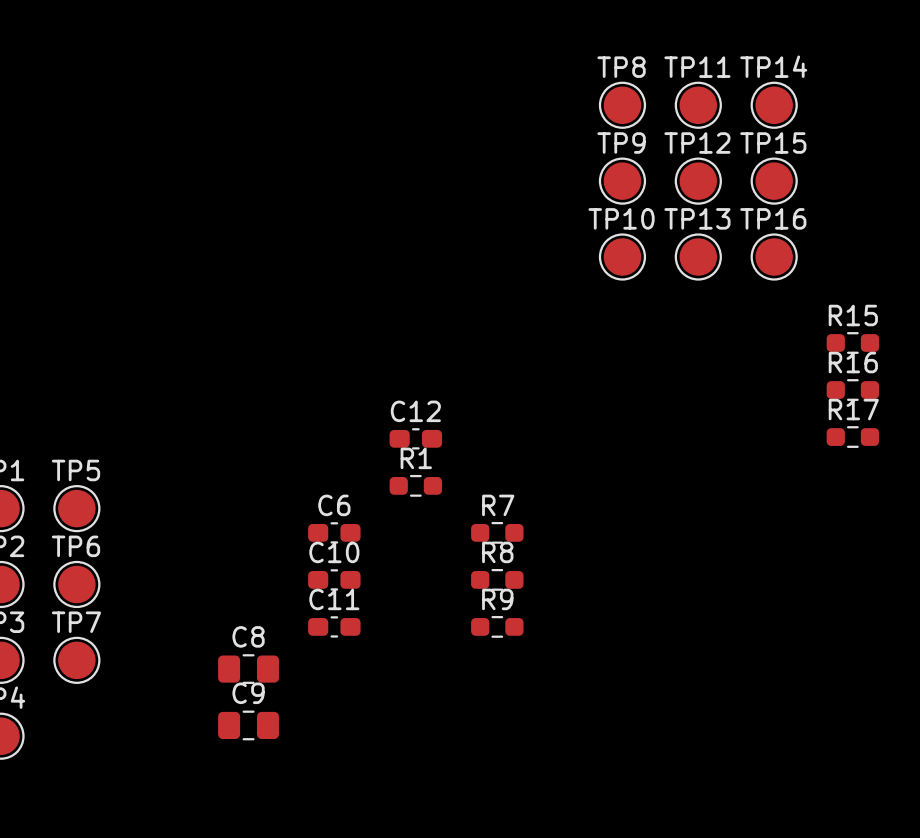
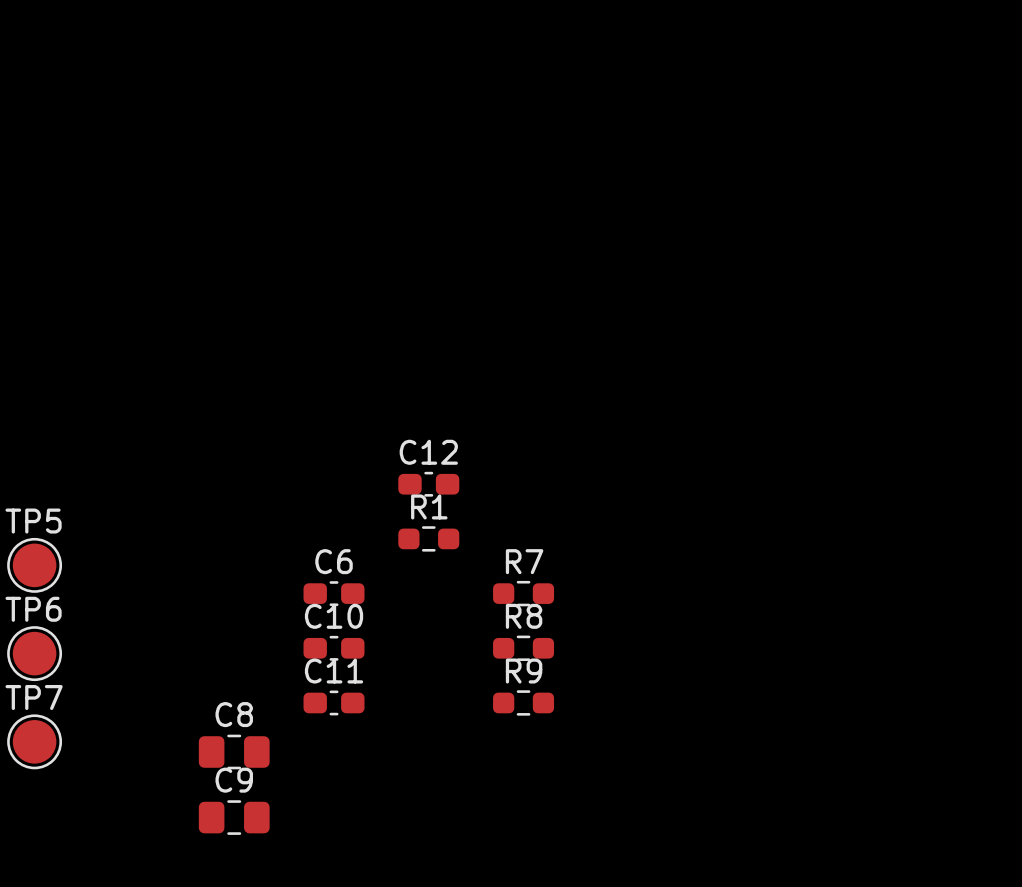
TP8: (622, 105) -> none
TP11: (698, 105) -> none
TP14: (774, 105) -> none
TP9: (622, 181) -> none
TP12: (698, 181) -> none
TP15: (774, 181) -> none
TP10: (622, 257) -> none
TP13: (698, 257) -> none
TP16: (774, 257) -> none
R15: (852, 342) -> none
R16: (852, 390) -> none
R17: (852, 437) -> none

